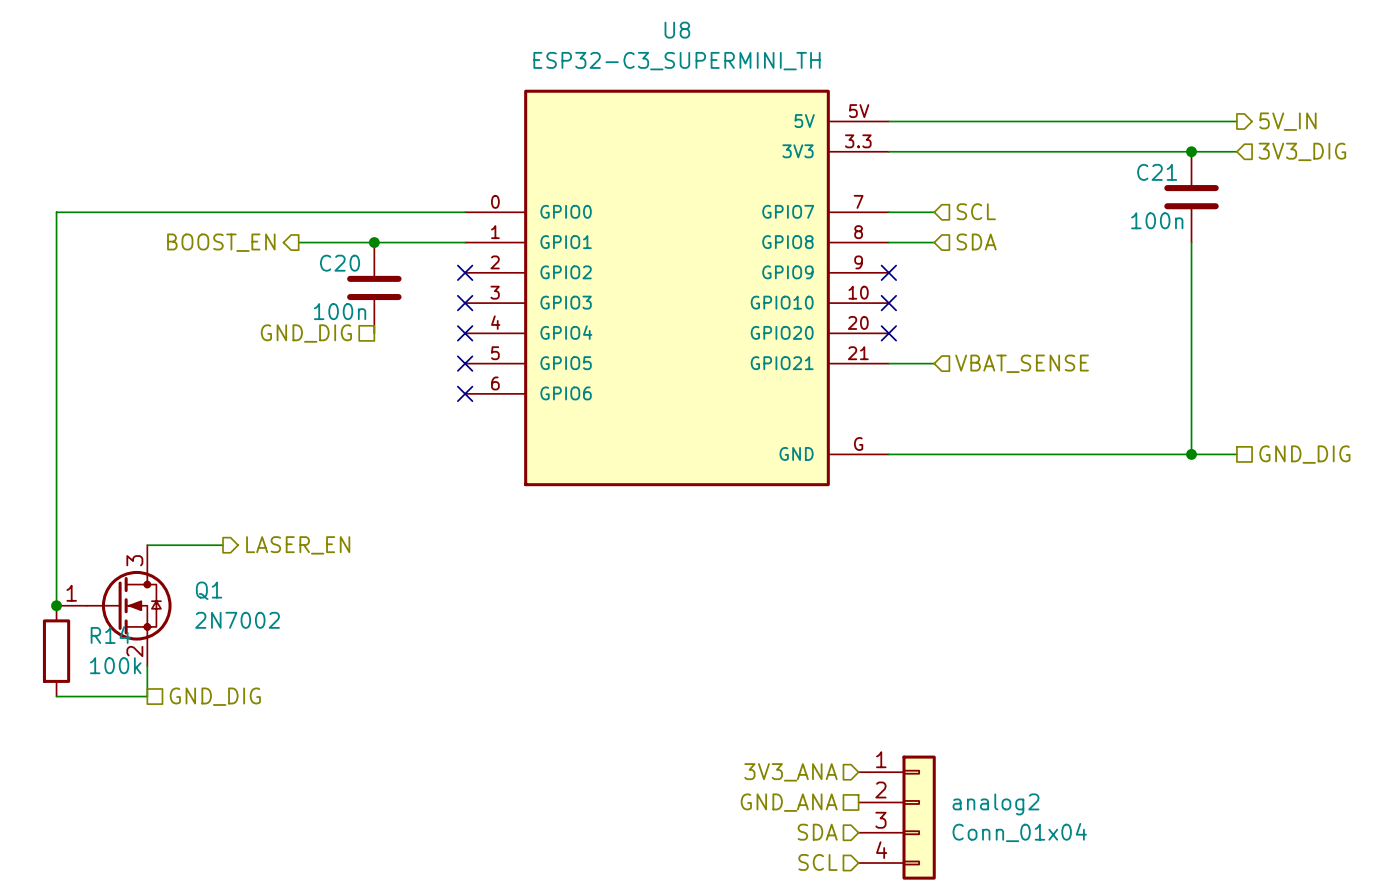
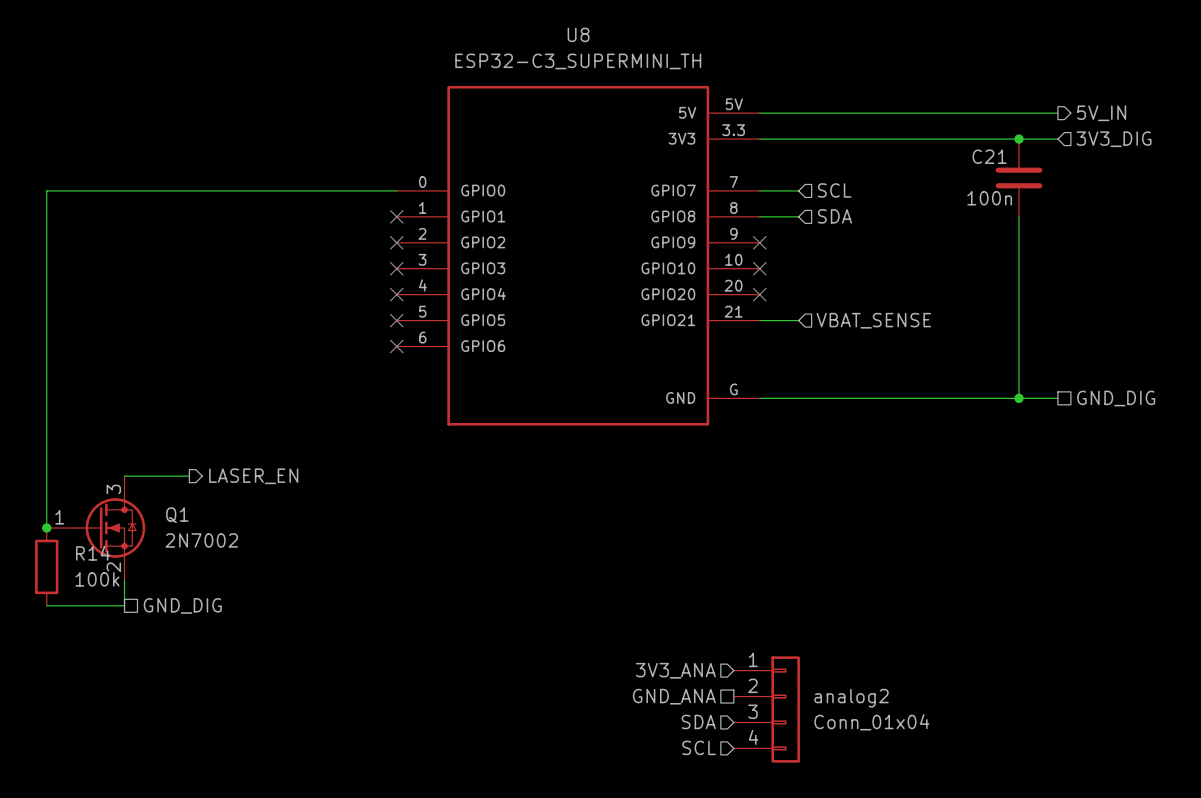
hierarchical label: BOOST_EN (221, 242) -> none
wire: (298, 242) (465, 242) -> none
junction: (374, 242) -> none
no-connect mark: none -> (396, 216)
C20: 100n (374, 287) -> none
hierarchical label: GND_DIG (306, 333) -> none

